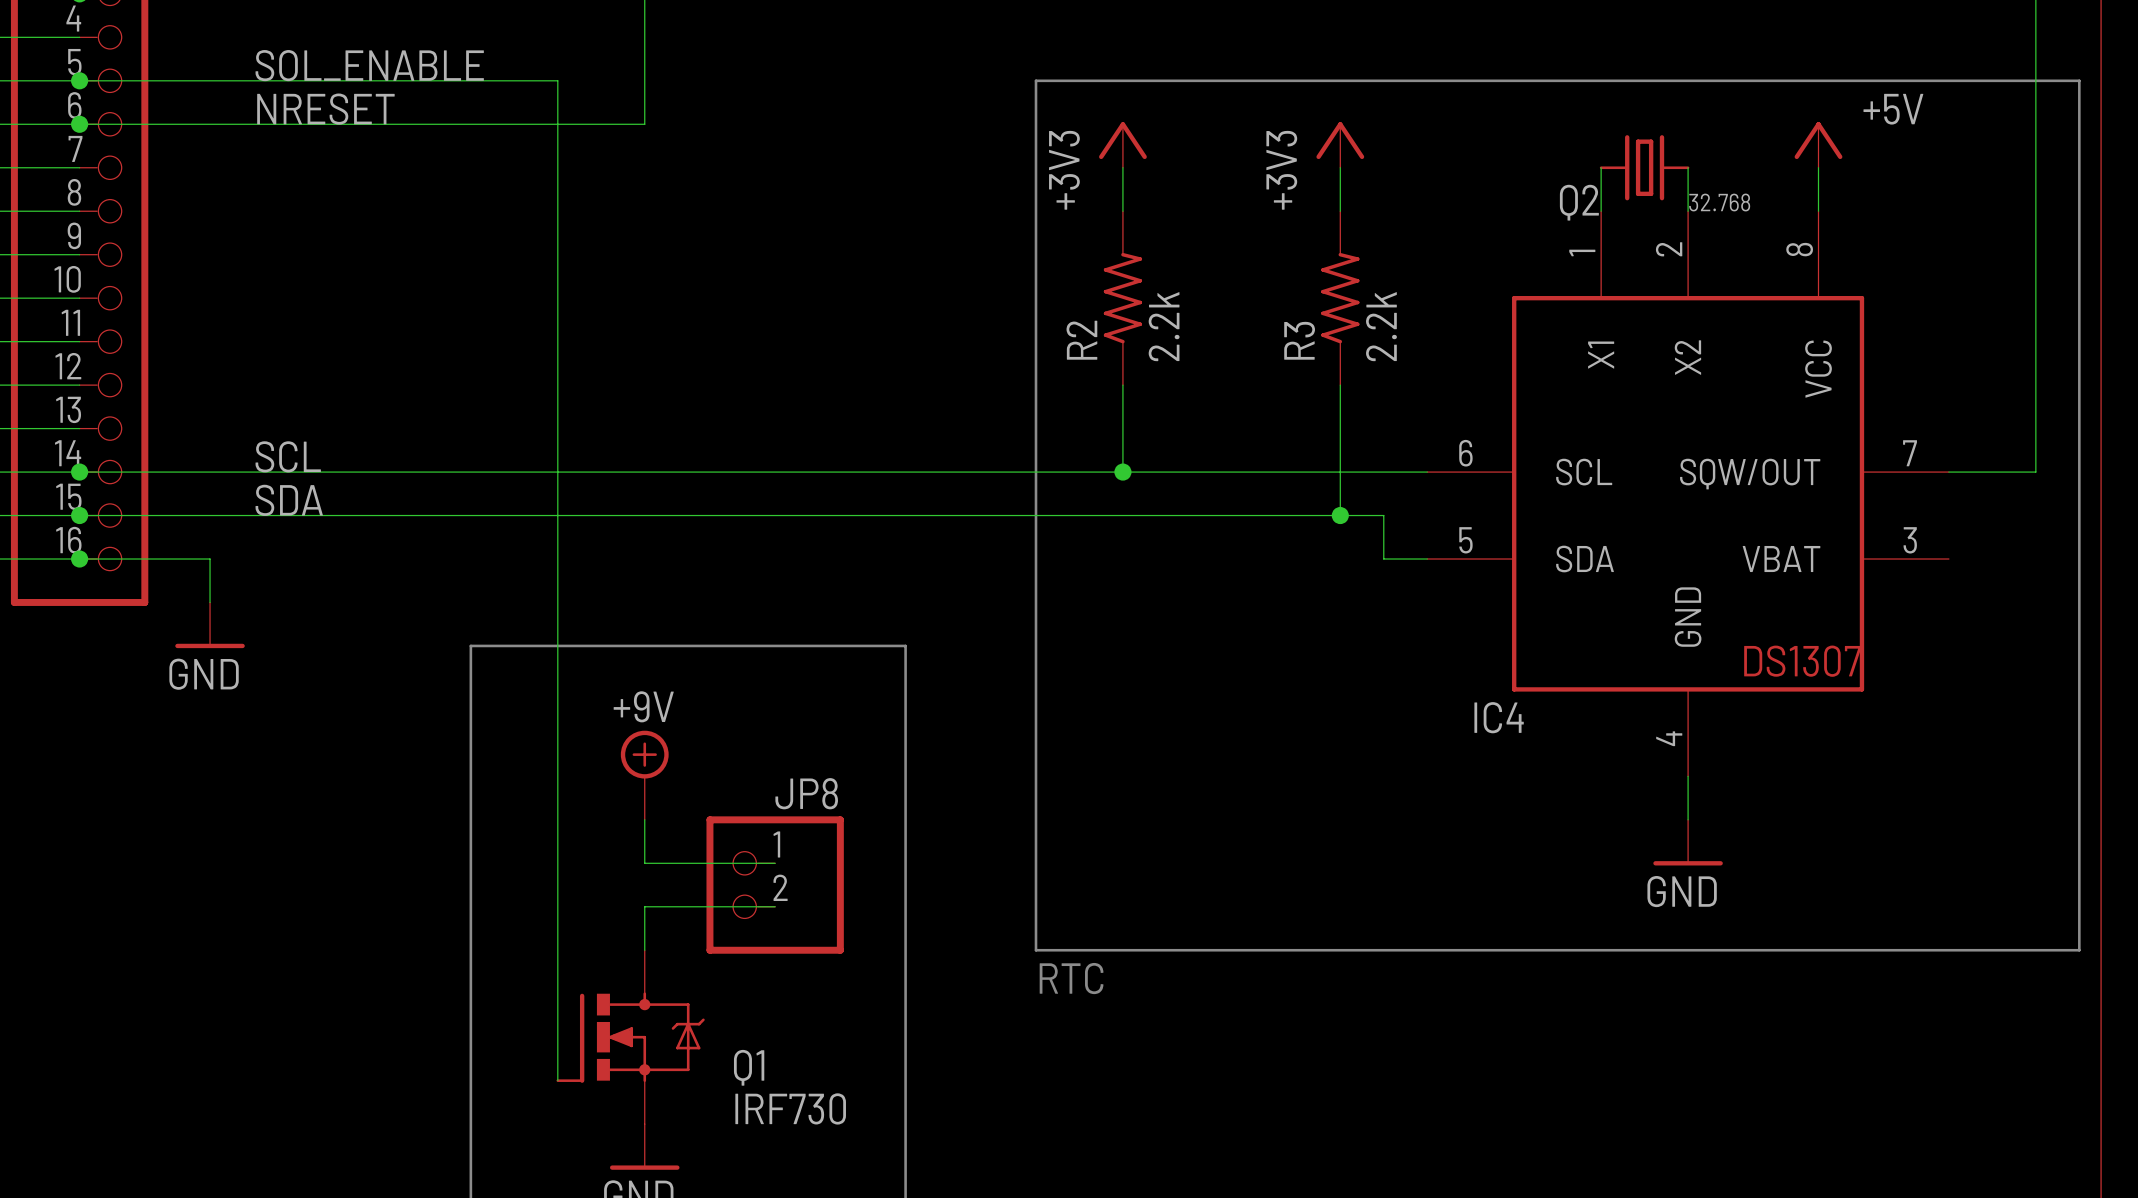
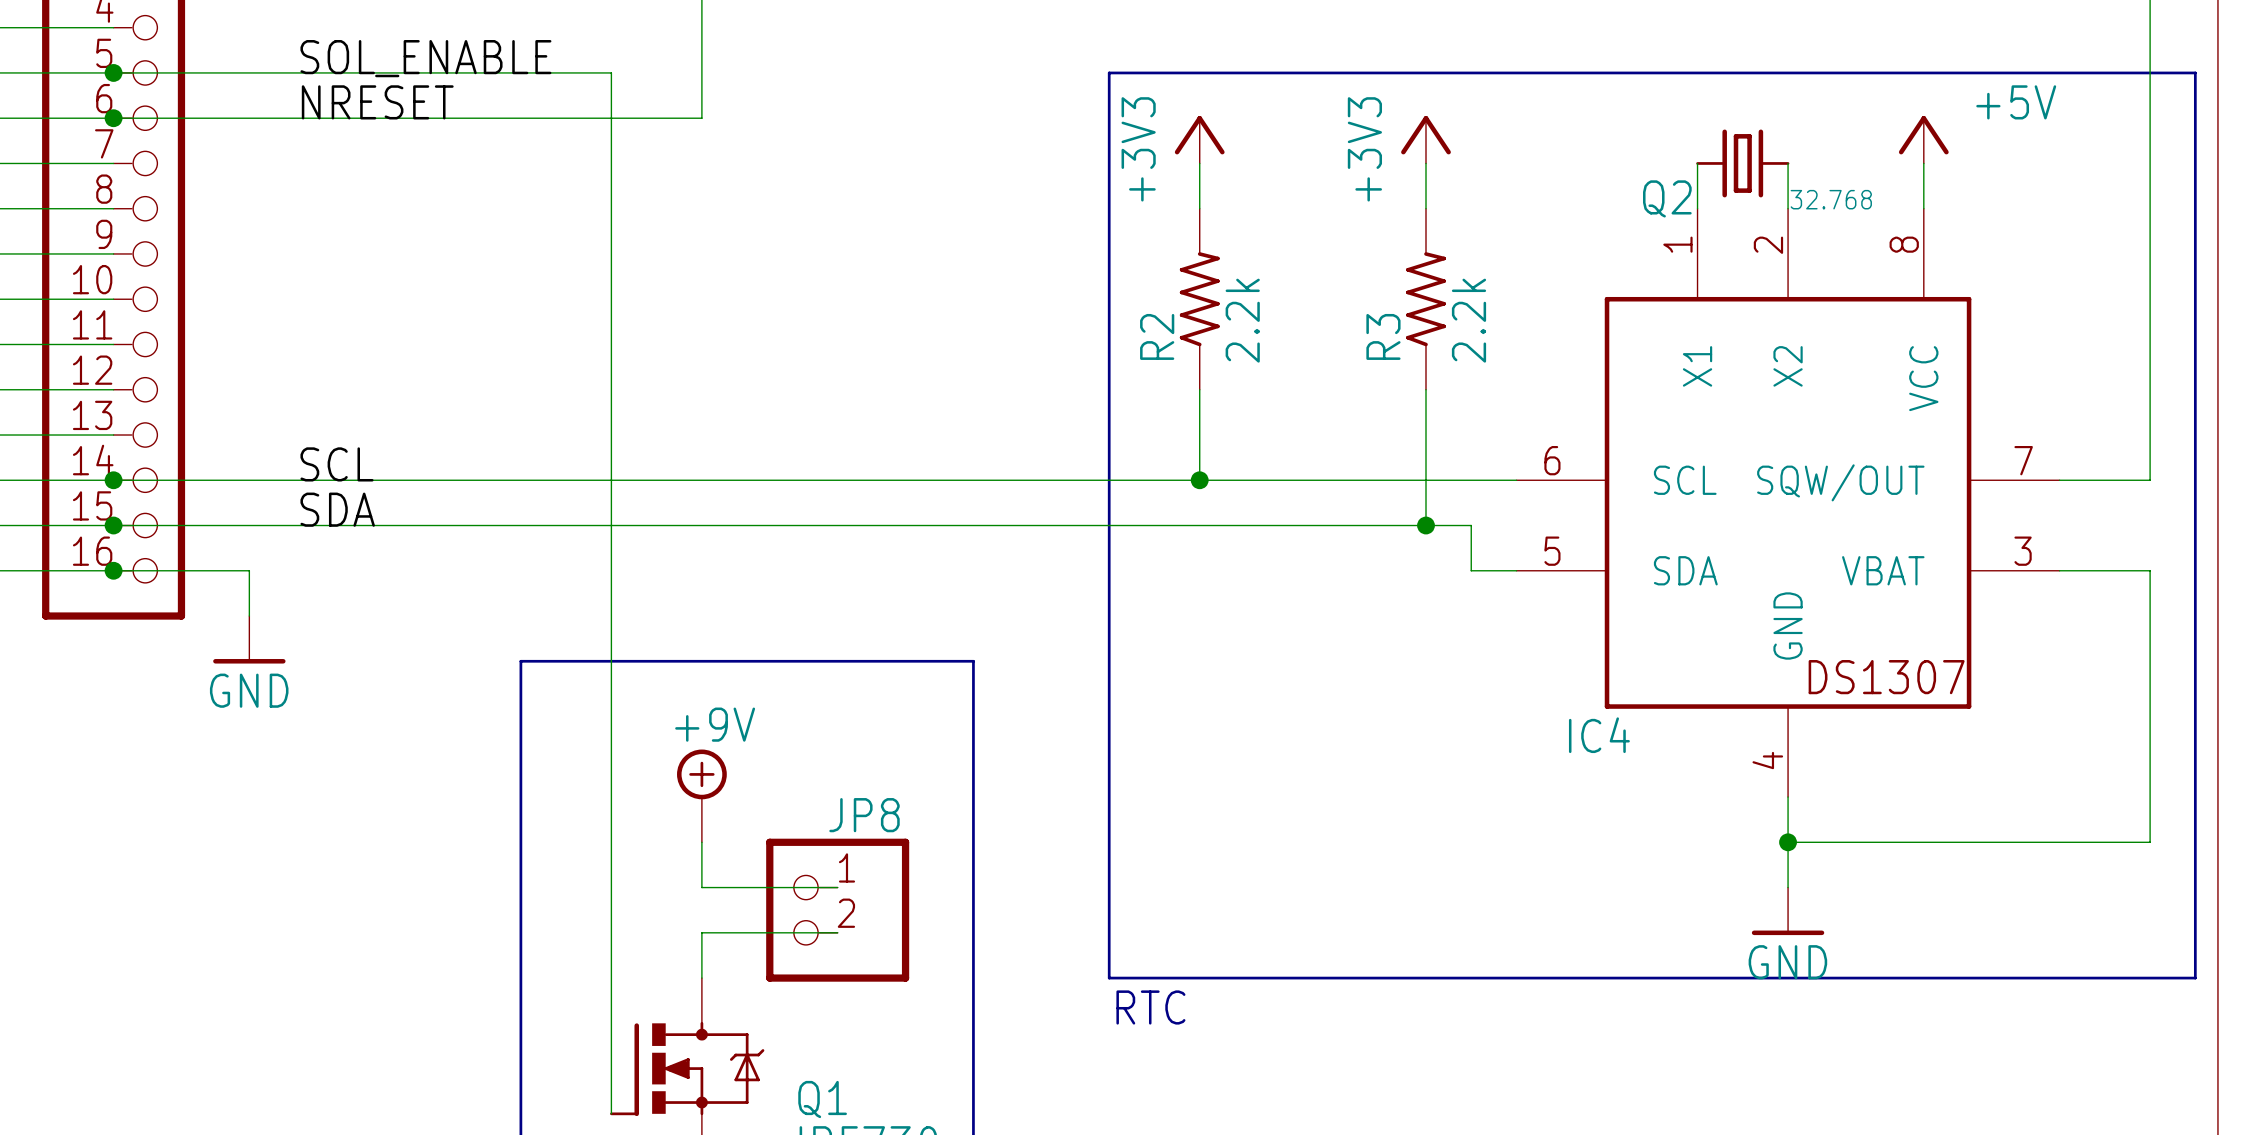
wire: none -> (2059, 570) (2150, 570) (2150, 842) (1788, 842) (1788, 887)
junction: none -> (1788, 842)
power symbol position: GND (1688, 842) -> GND (1788, 911)

